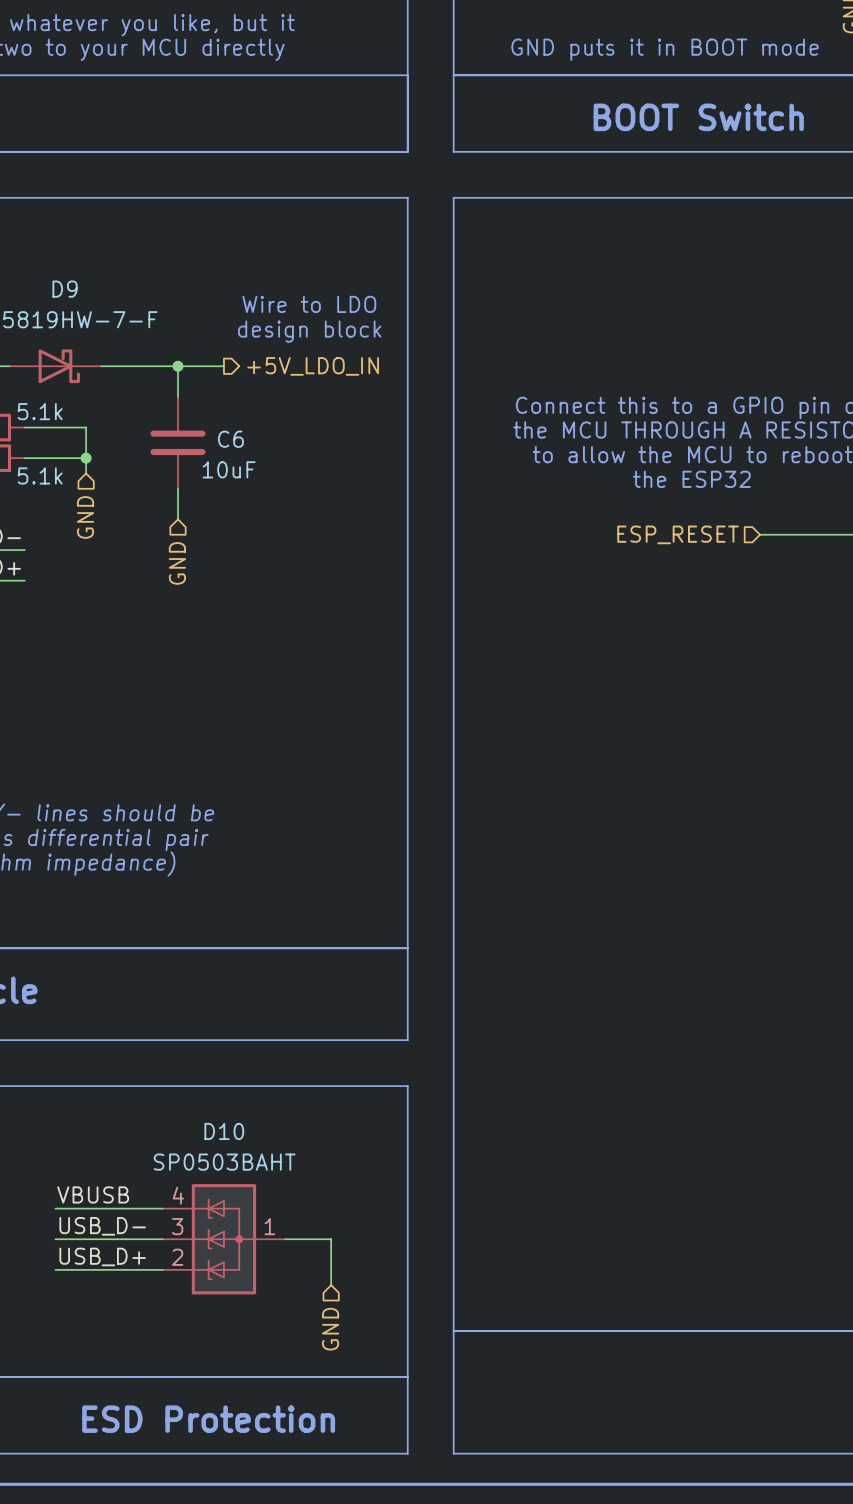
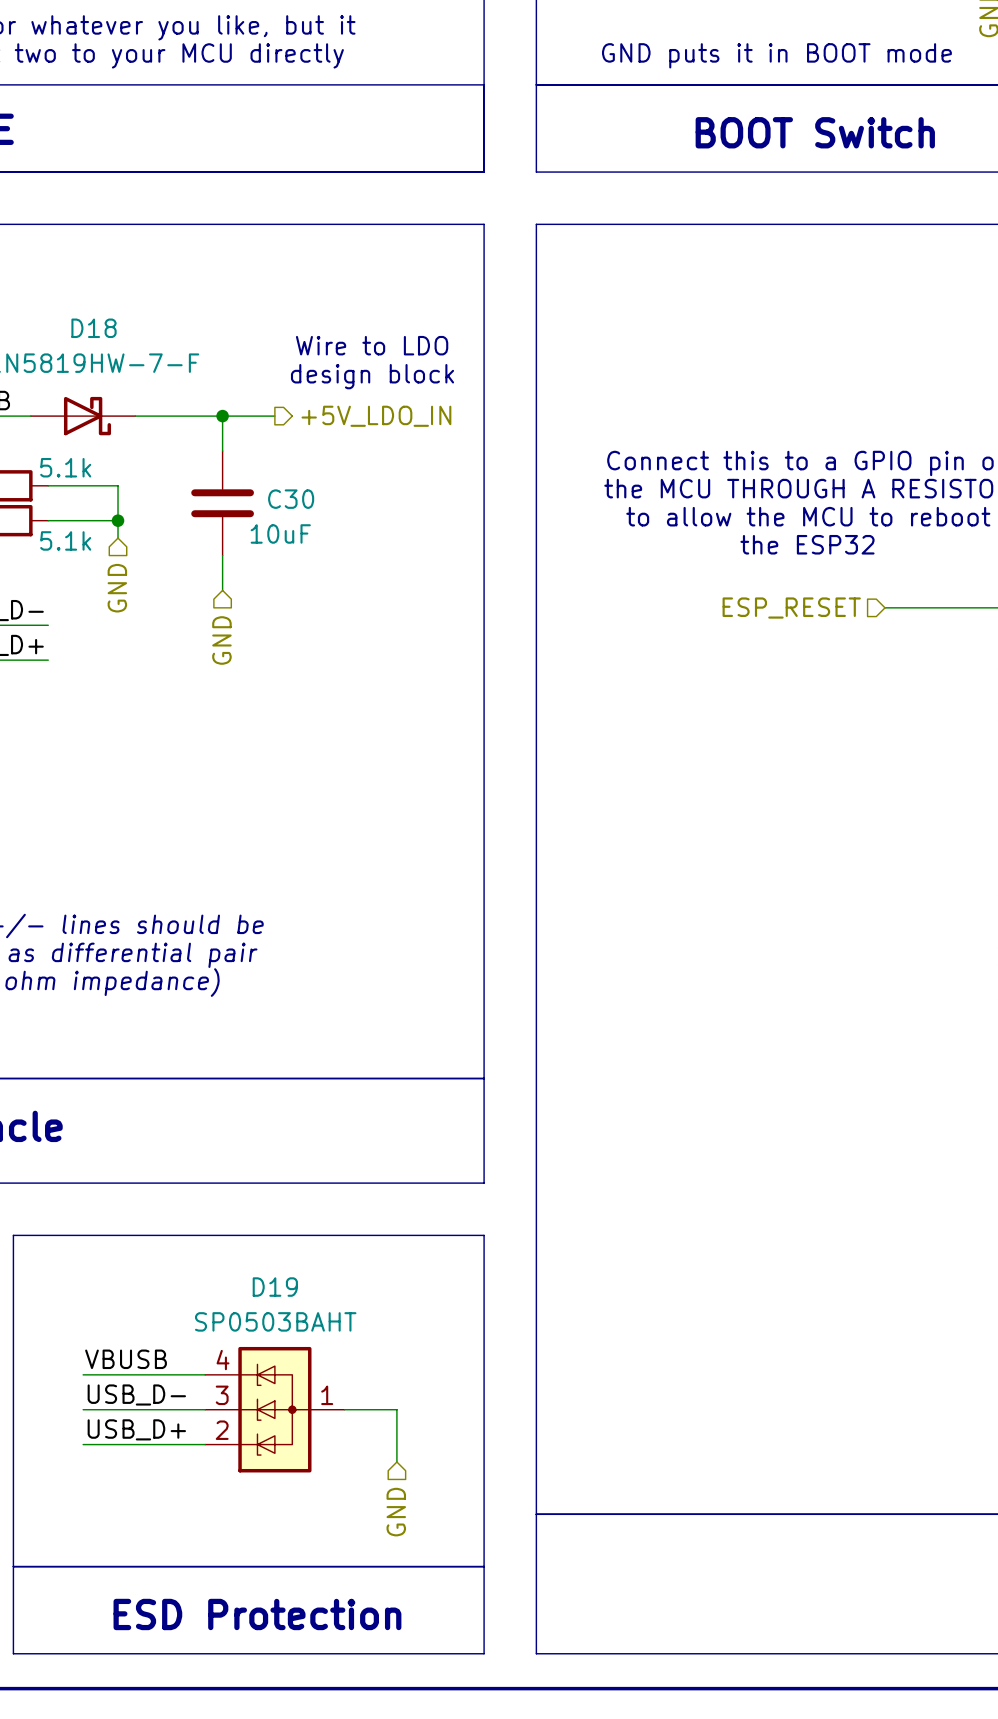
D9 name: D9 (65, 289) -> D18 (94, 328)
C6 name: C6 (230, 439) -> C30 (291, 499)
D10 name: D10 (224, 1131) -> D19 (275, 1287)

